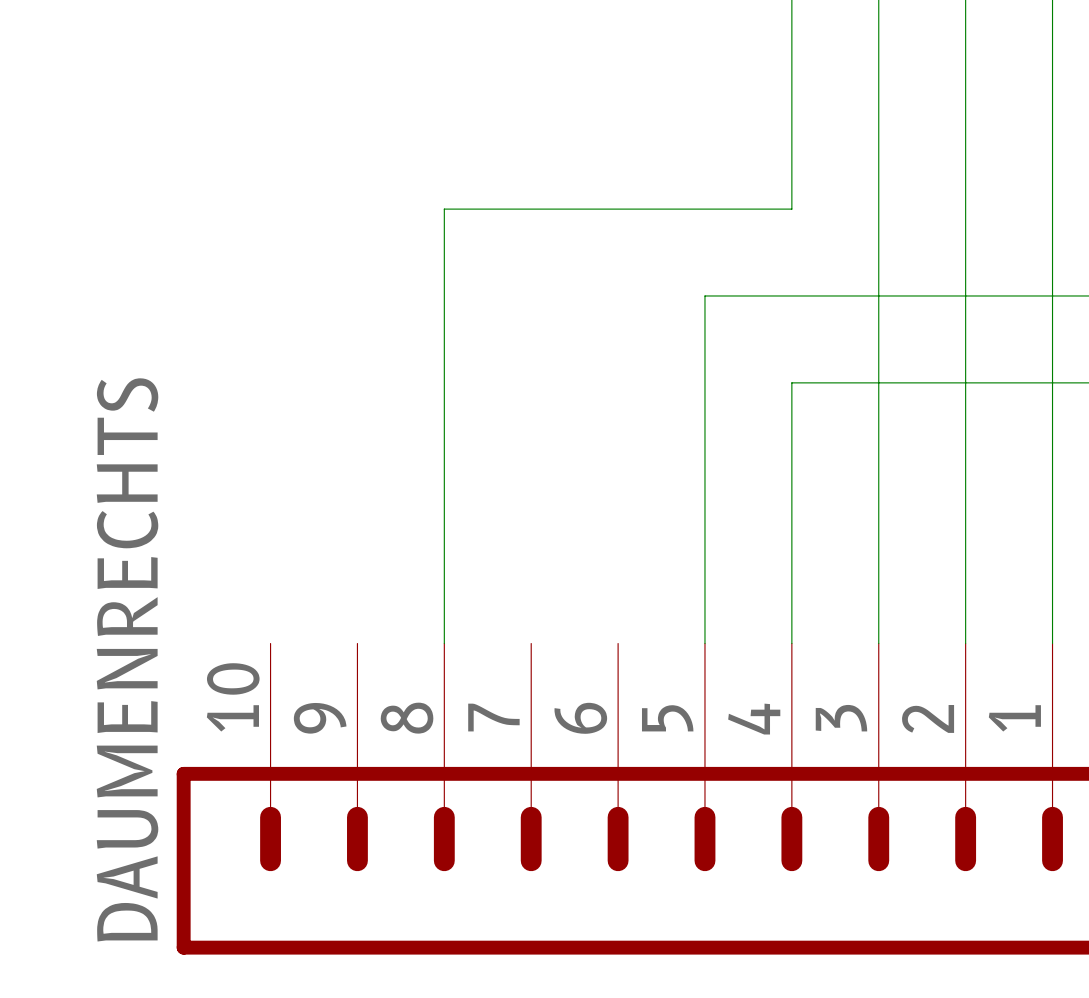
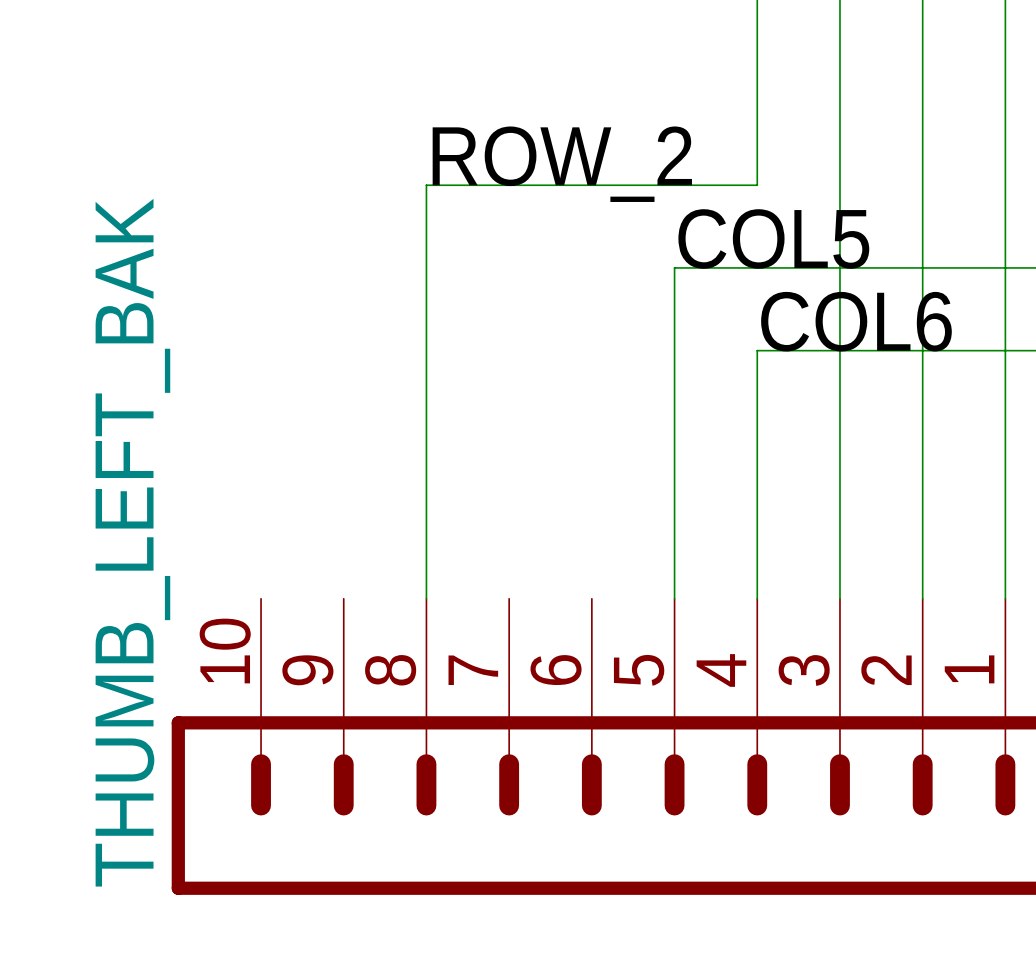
label: none -> ROW_2 (562, 164)
label: none -> COL5 (773, 238)
label: none -> COL6 (856, 321)
DAUMENRECHTS name: DAUMENRECHTS (127, 659) -> THUMB_LEFT_BAK (132, 542)

